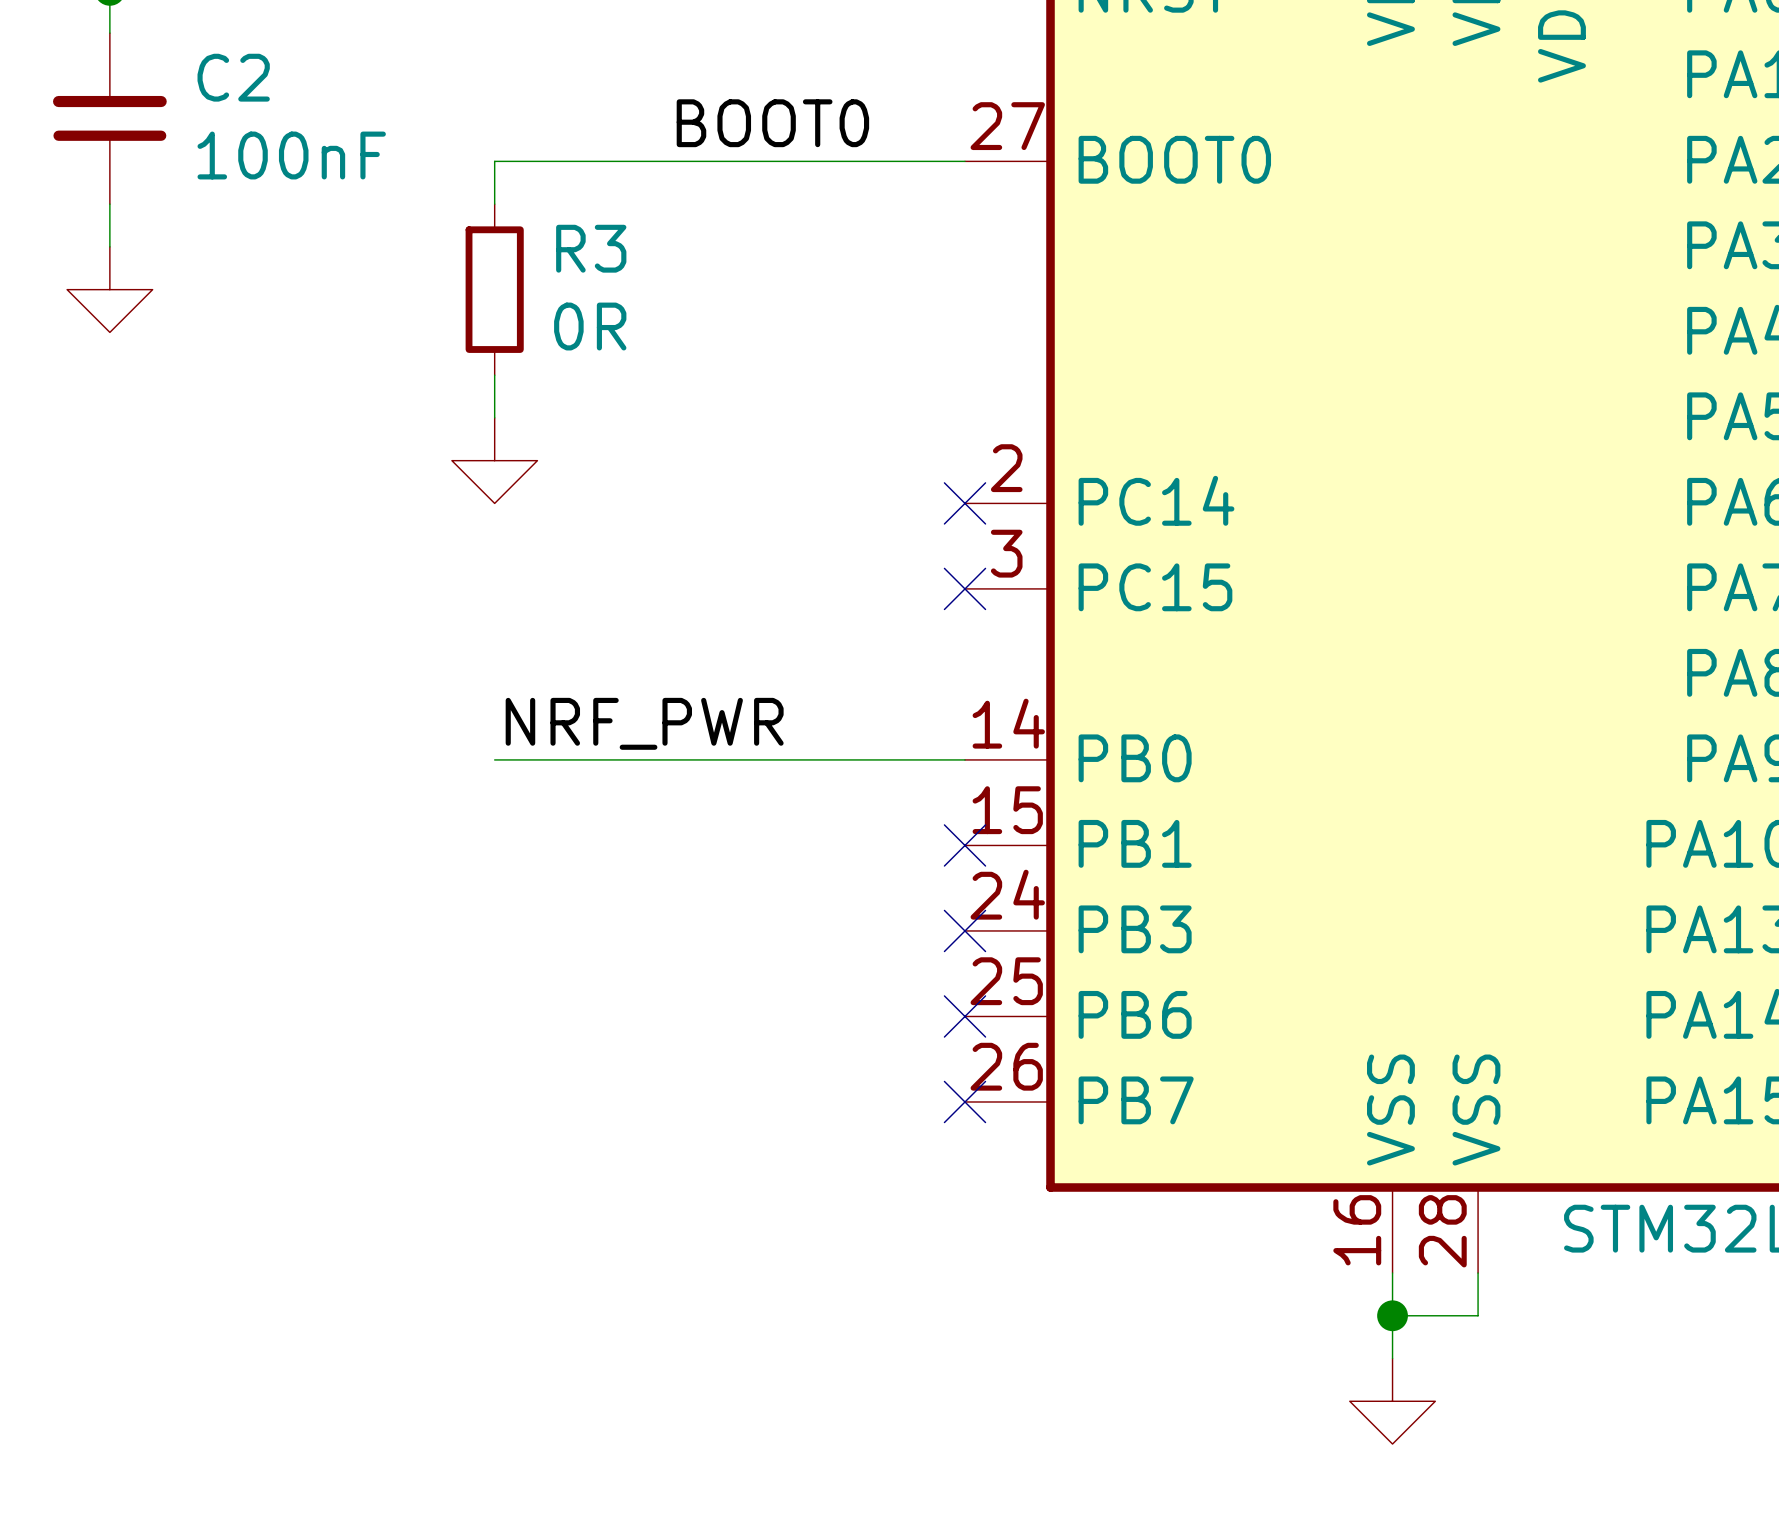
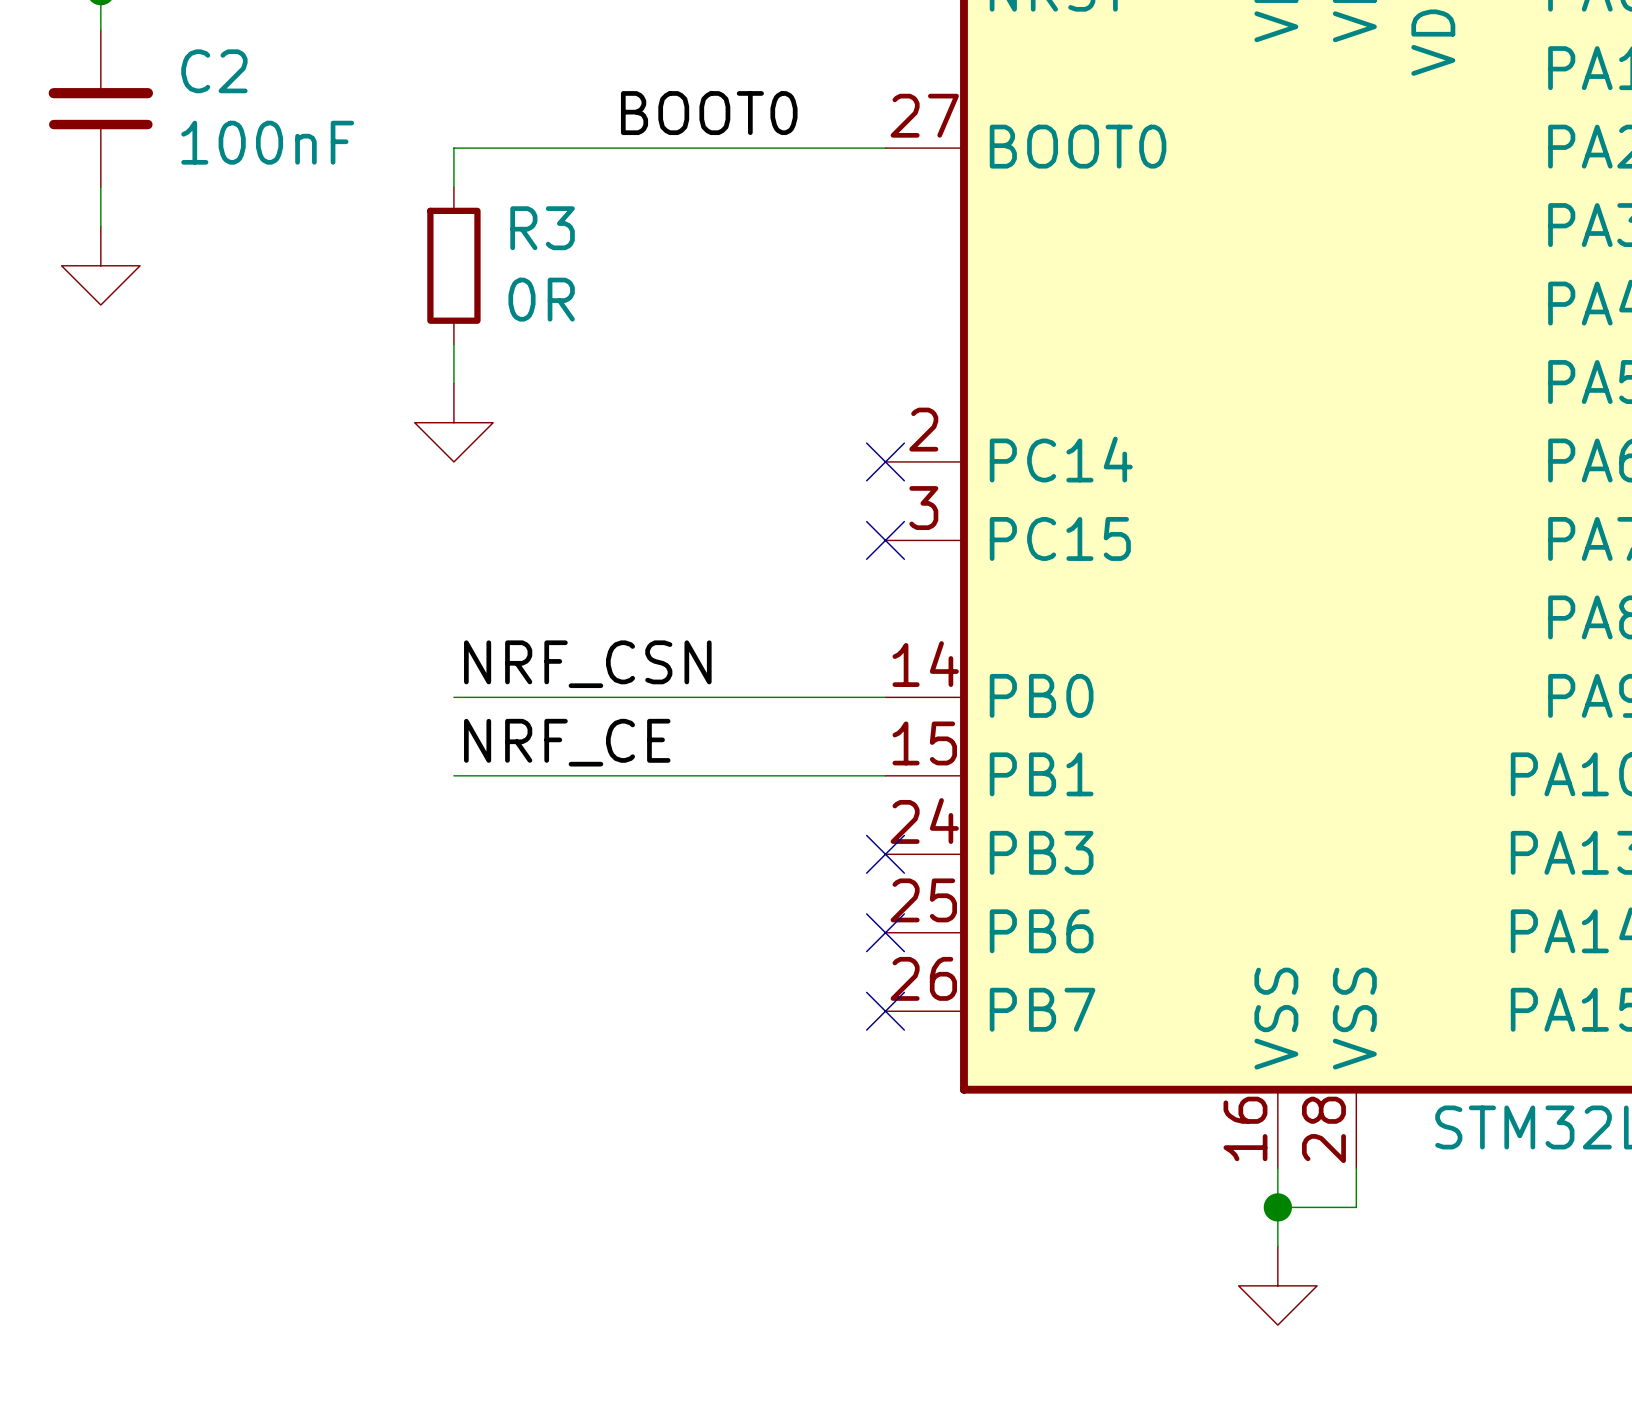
label: NRF_PWR (644, 723) -> NRF_CSN (587, 664)
label: none -> NRF_CE (567, 742)
wire: none -> (453, 775) (885, 775)
no-connect mark: (964, 845) -> none

